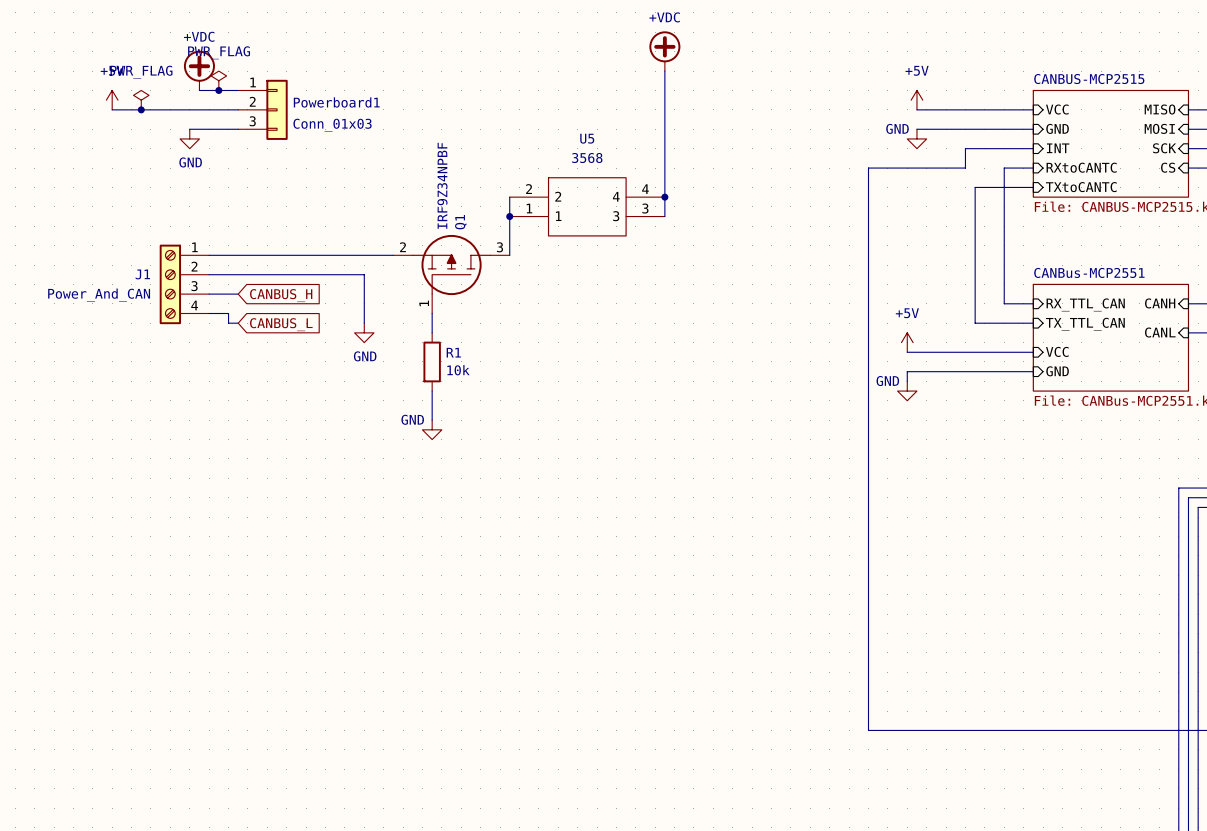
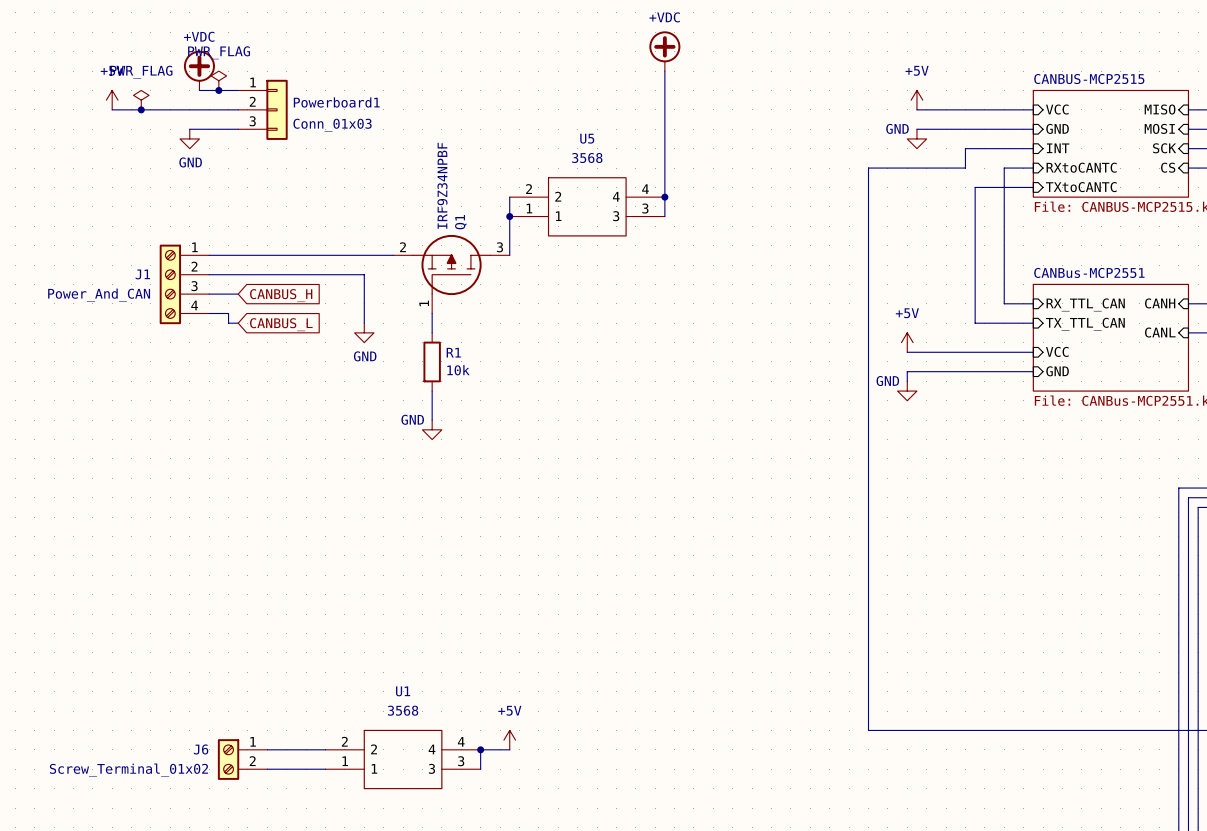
power symbol: none -> +5V (509, 740)
wire: none -> (267, 749) (325, 749)
junction: none -> (480, 749)
wire: none -> (509, 749) (480, 749) (480, 769)
J6: none -> Screw_Terminal_01x02 (242, 759)
U1: none -> 3568 (403, 759)
wire: none -> (267, 769) (325, 769)

